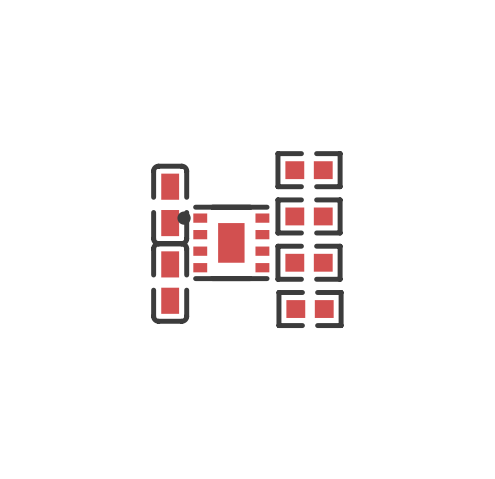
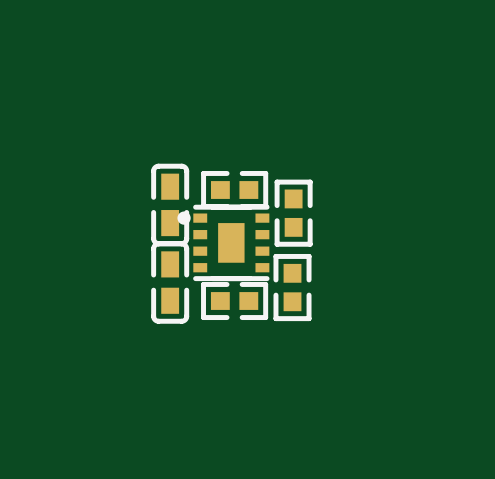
part: (309, 170) -> none
part: none -> (234, 190)
part rotation: 0° (309, 216) -> 90° clockwise (293, 213)
part: (309, 262) -> none
part: none -> (292, 287)
part: none -> (234, 301)
part: (310, 309) -> none

